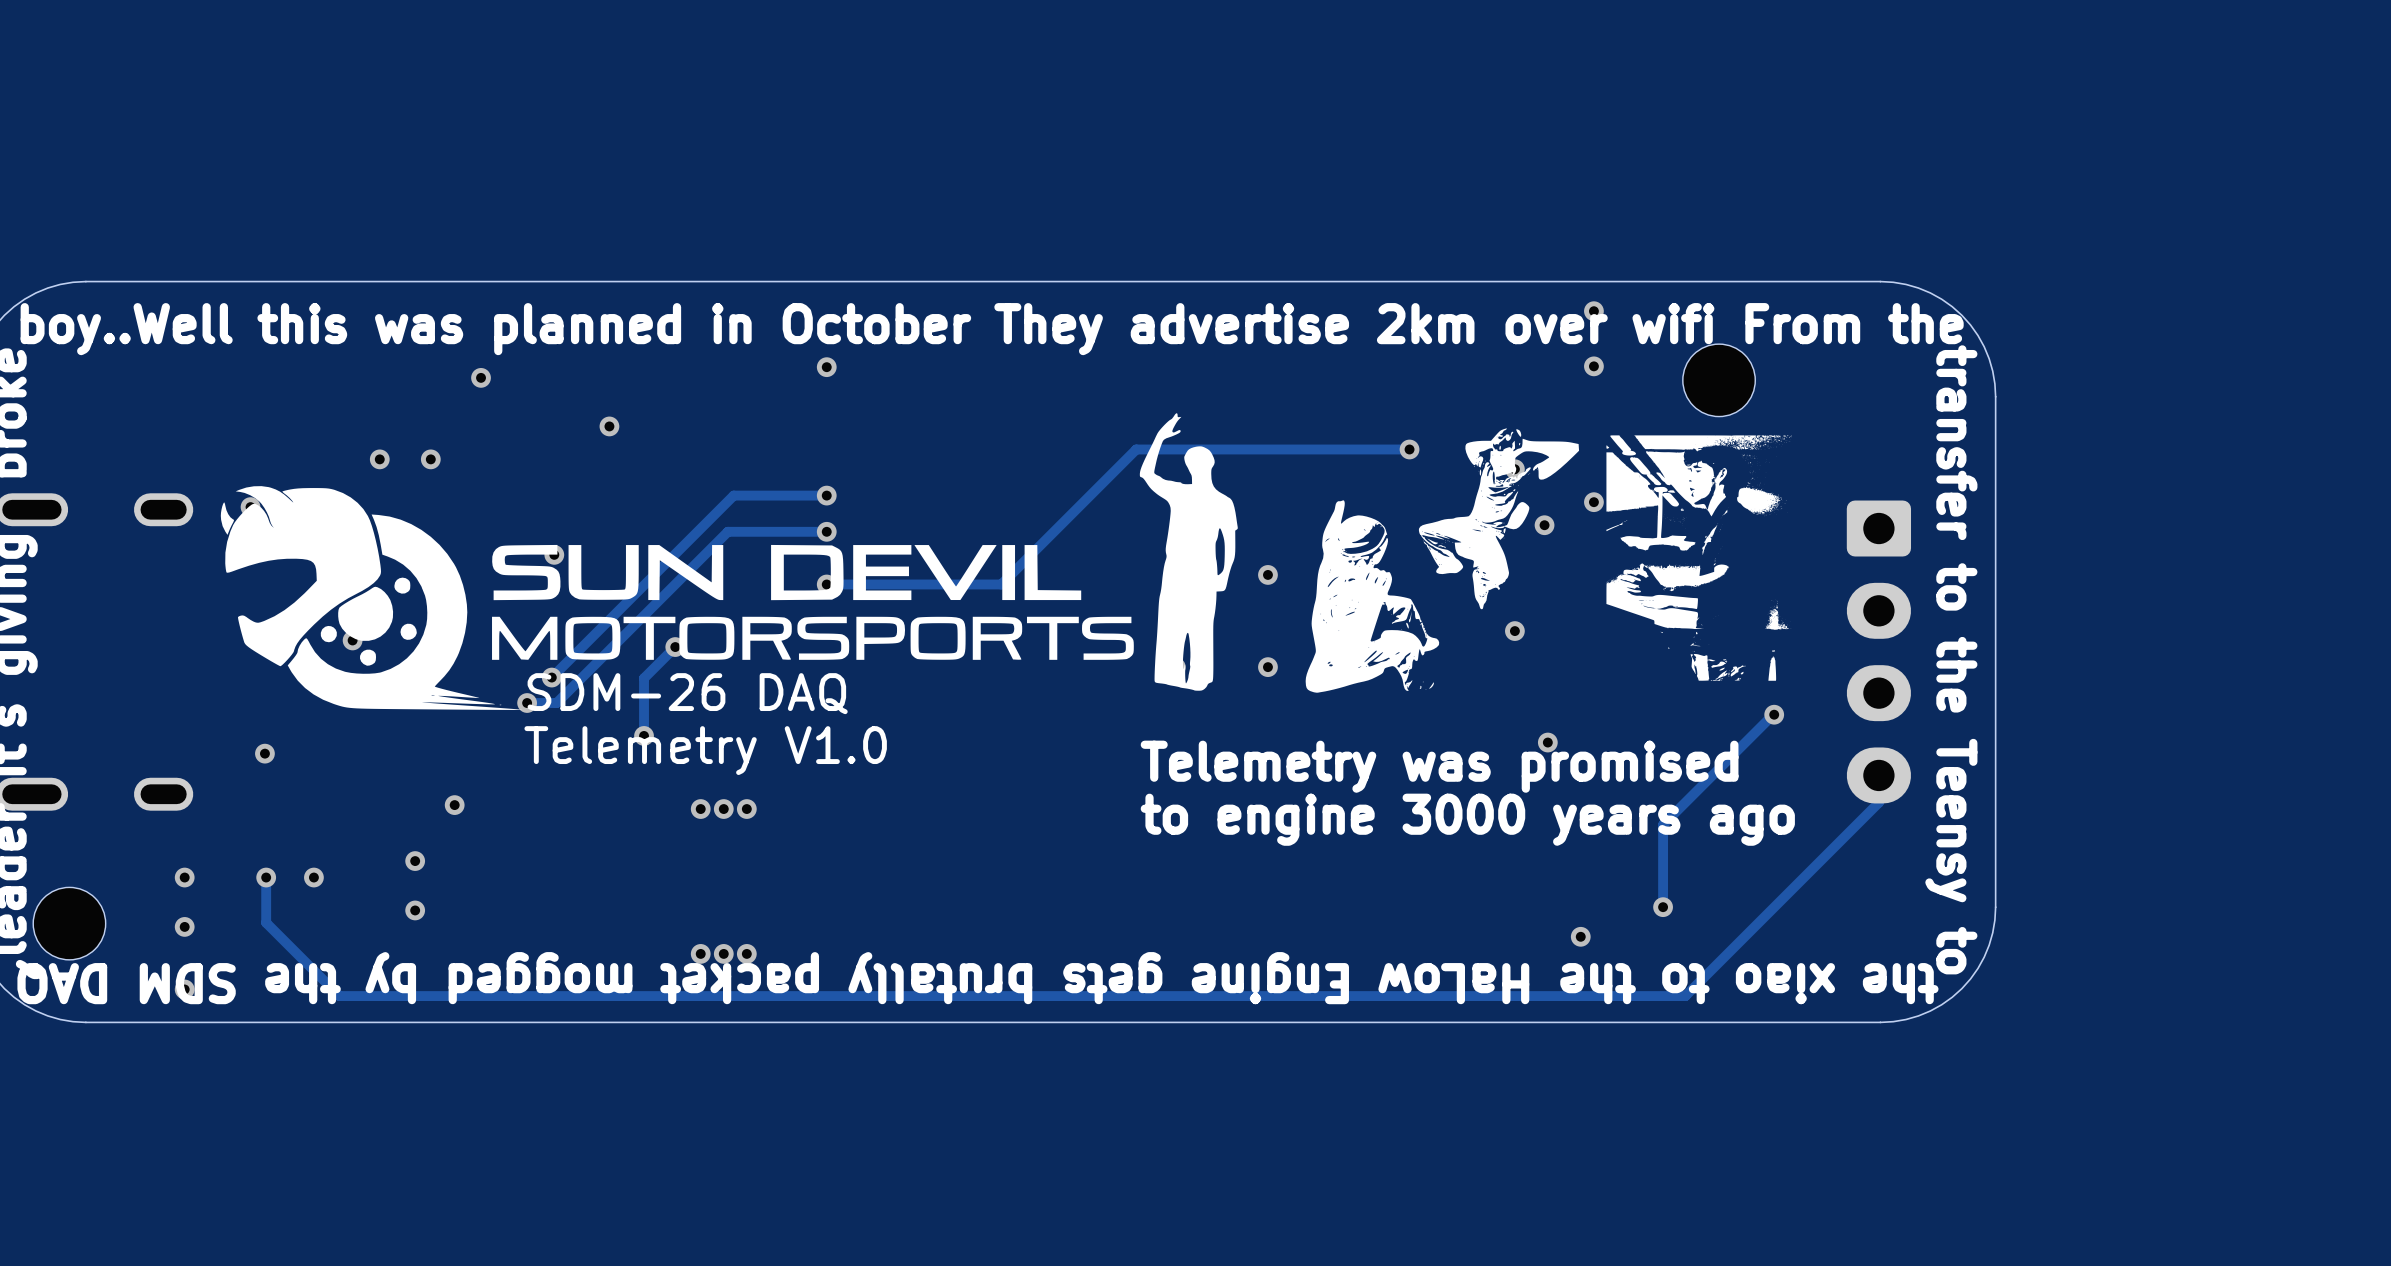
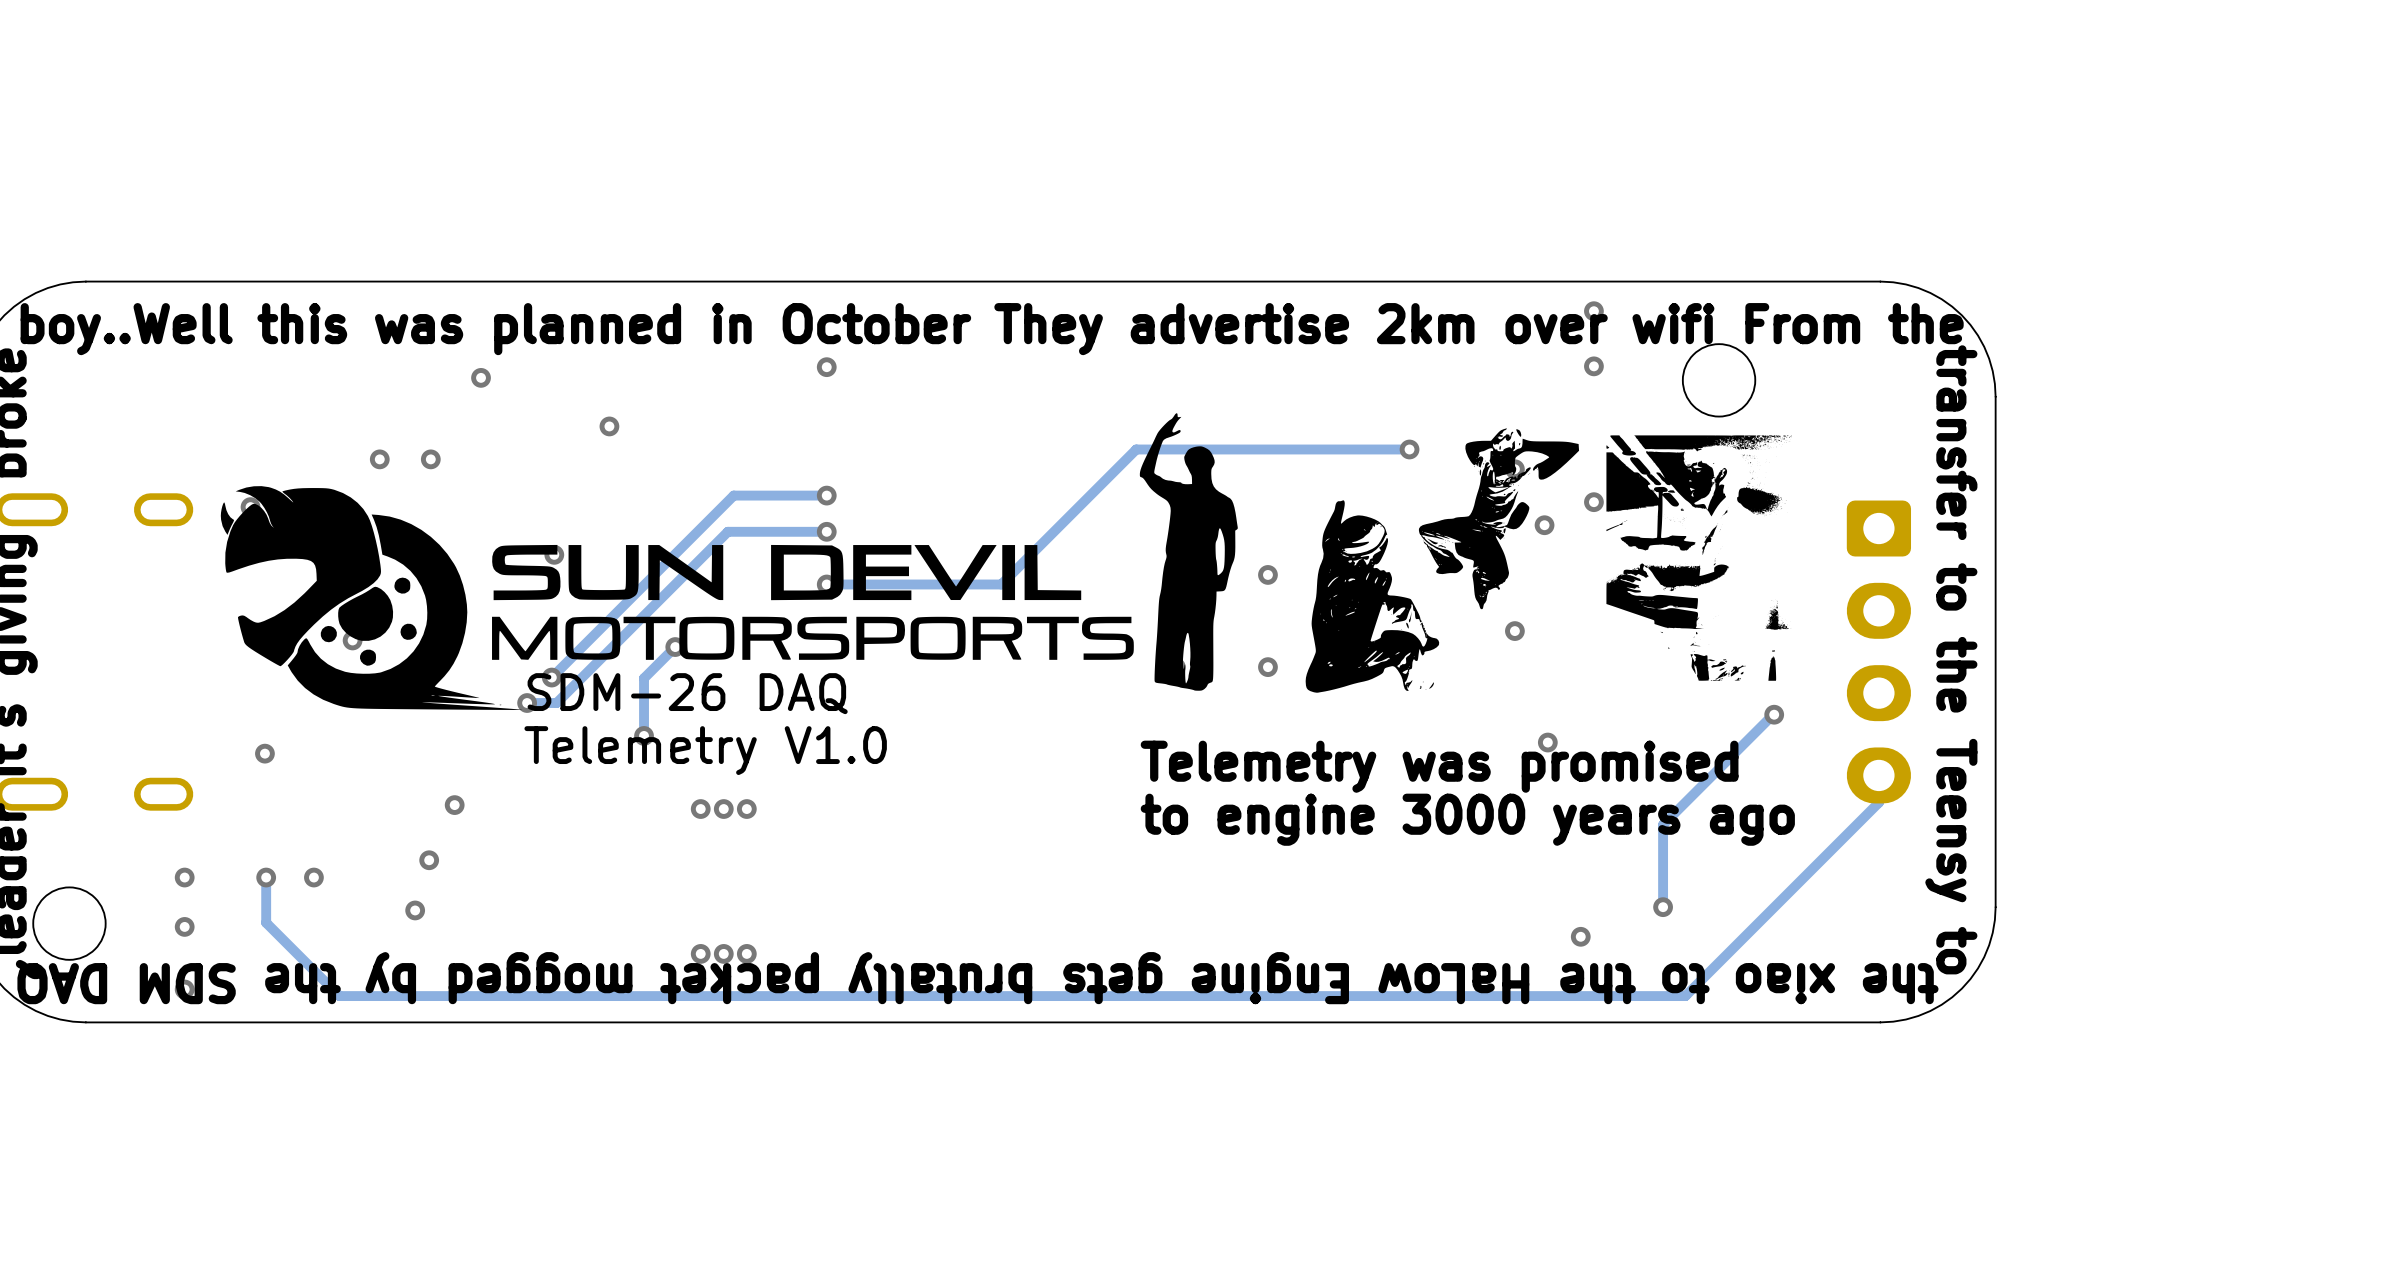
via position: (415, 861) -> (429, 860)

